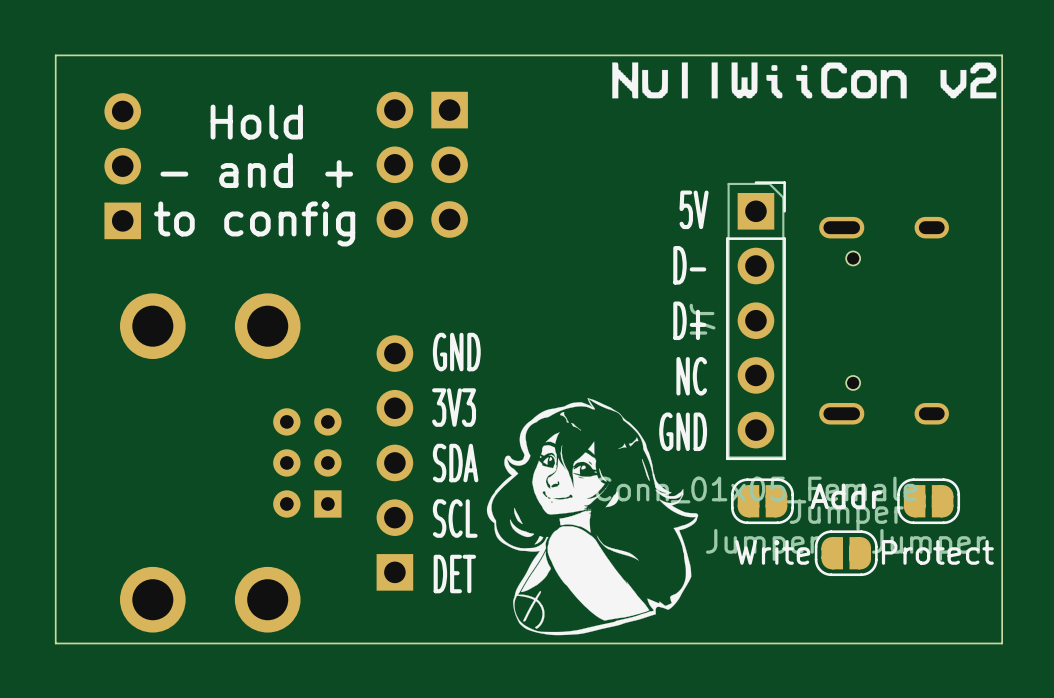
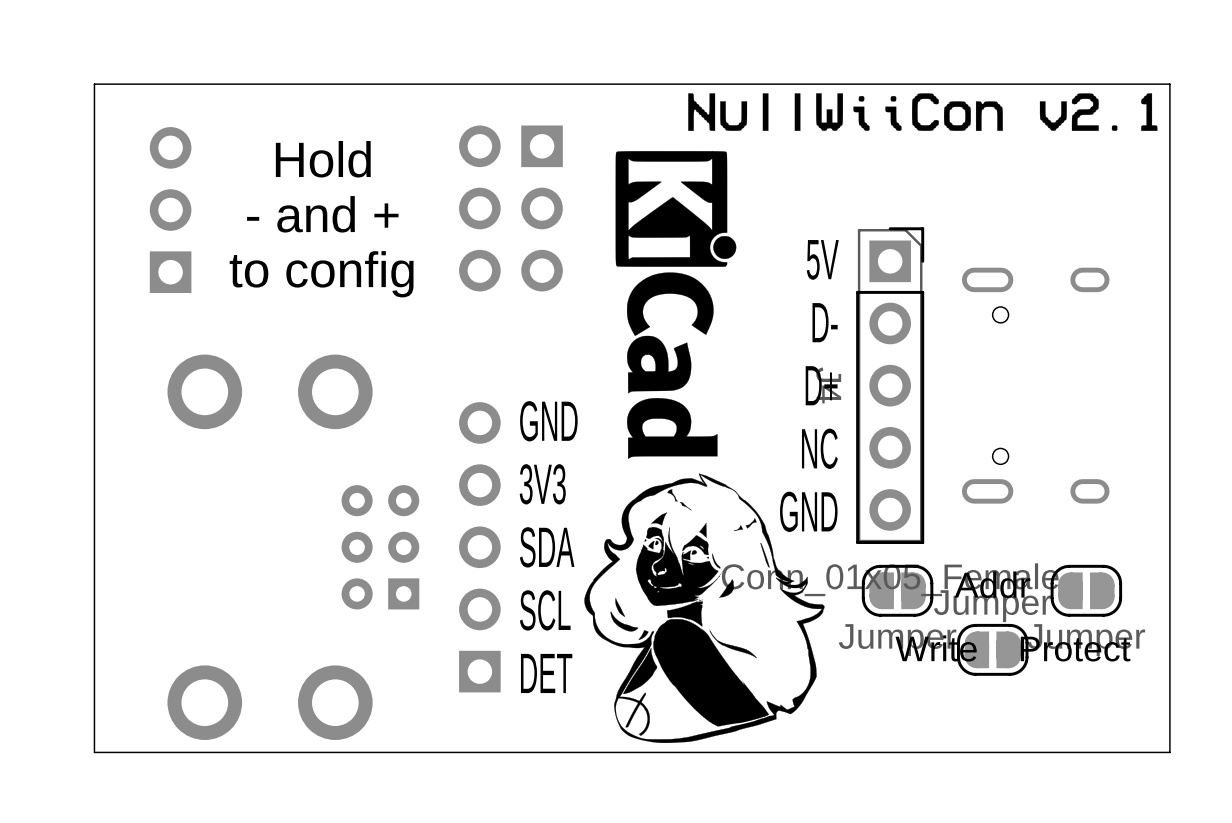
drawing shape: [612, 62, 997, 99] -> [688, 93, 1158, 131]
drawing: none -> [615, 151, 737, 459]

